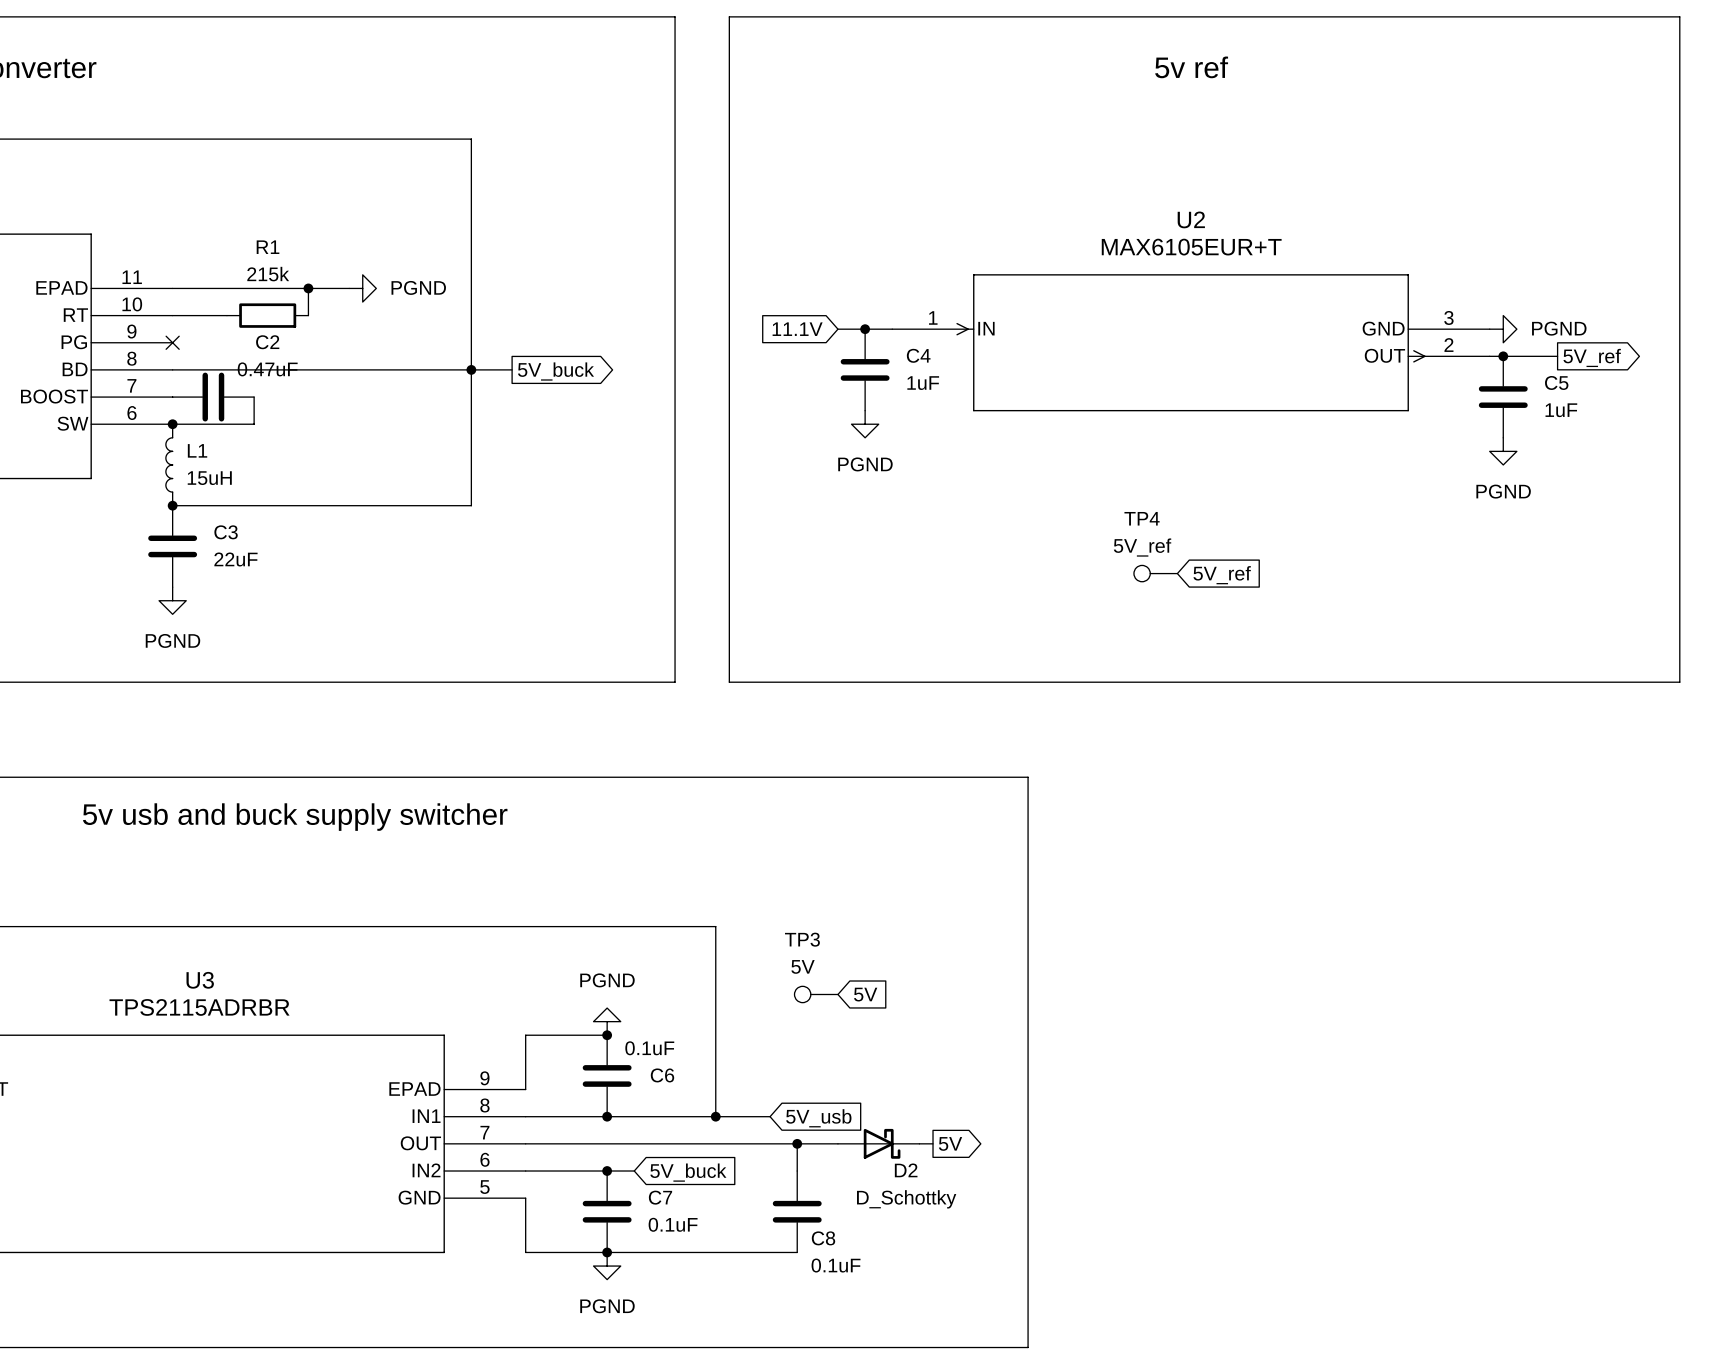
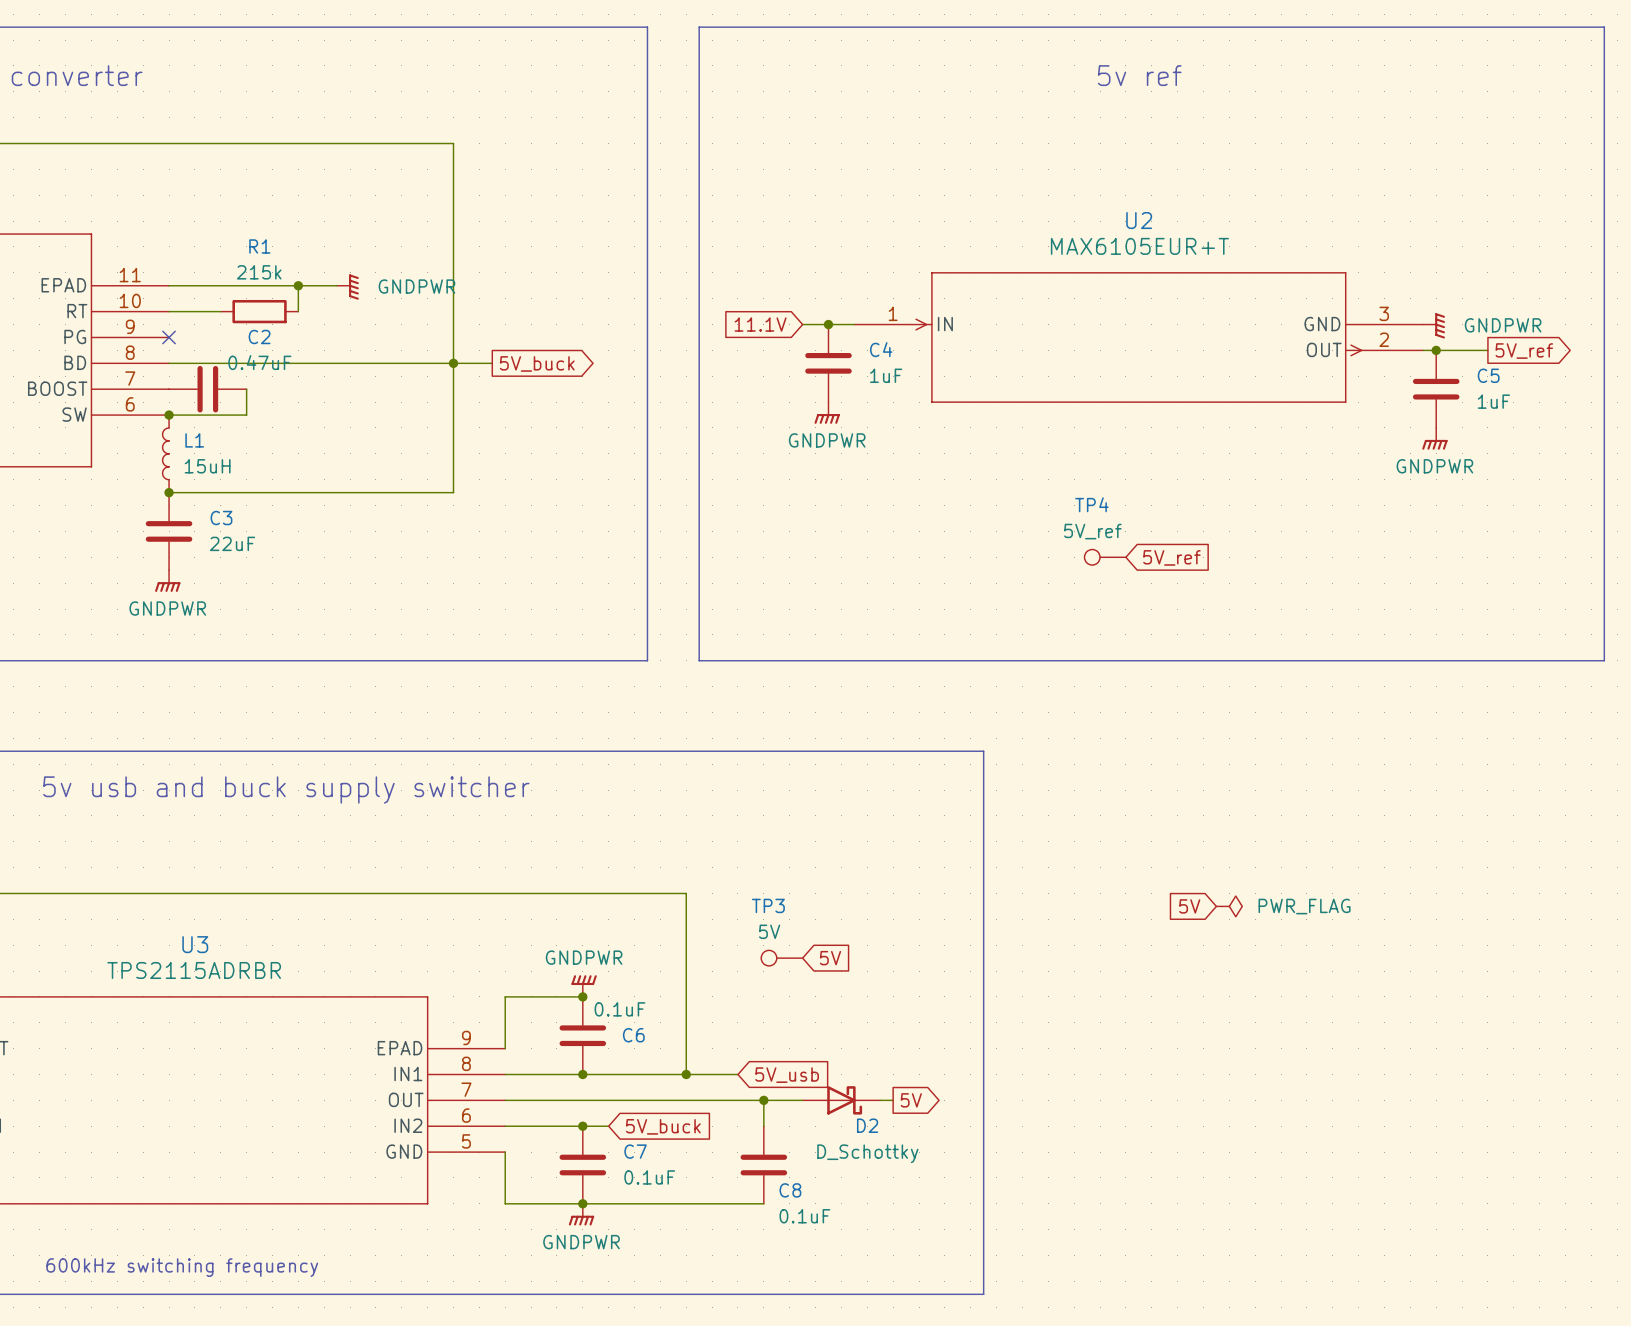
power symbol: PGND (362, 288) -> GNDPWR (348, 287)
power symbol: PGND (1503, 329) -> GNDPWR (1434, 325)
power symbol: PGND (865, 424) -> GNDPWR (827, 412)
power symbol: PGND (1503, 451) -> GNDPWR (1434, 438)
power symbol: PGND (172, 600) -> GNDPWR (167, 581)
global label: none -> 5V (1189, 906)
power symbol: none -> PWR_FLAG (1229, 906)
power symbol: PGND (607, 1021) -> GNDPWR (584, 986)
power symbol: PGND (607, 1266) -> GNDPWR (581, 1214)
text: none -> 600kHz switching frequency (182, 1267)

